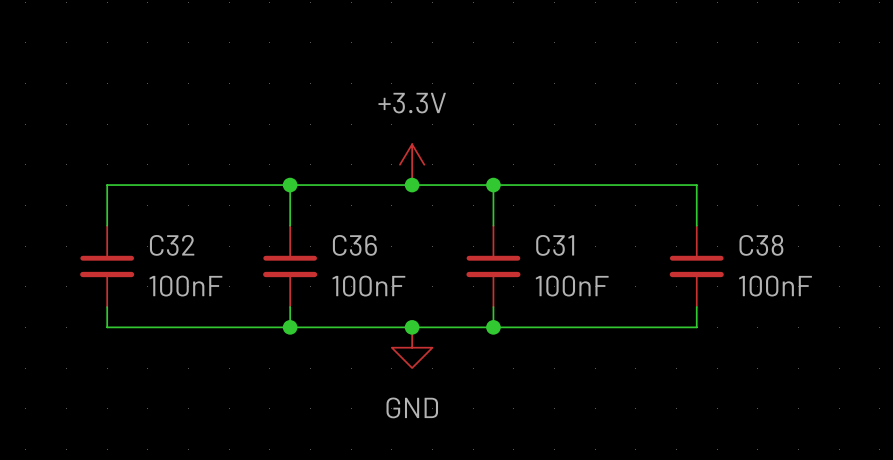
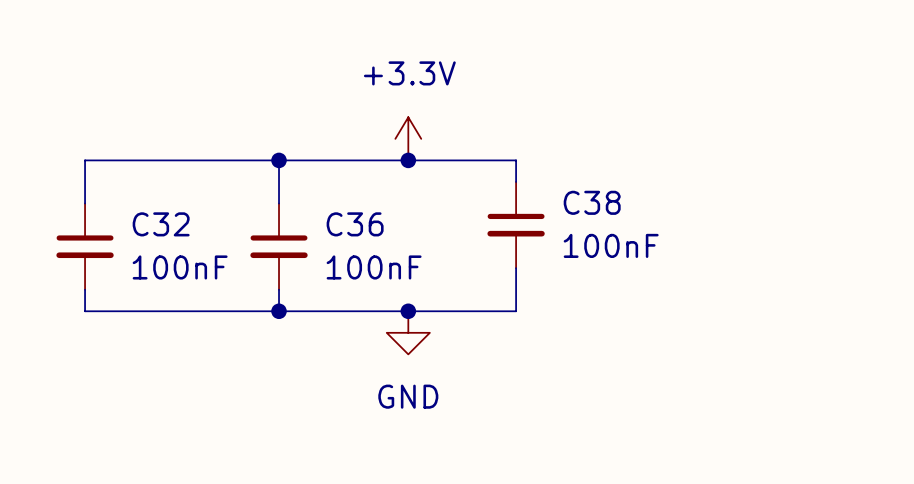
wire: (493, 185) (493, 225) -> none
junction: (493, 185) -> none
wire: (513, 185) (696, 185) (696, 225) -> (516, 160) (516, 181)
C31: 100nF (493, 266) -> none
C38 position: (696, 266) -> (516, 225)
wire: (493, 307) (493, 327) -> none
wire: (696, 307) (696, 327) (513, 327) -> (516, 268) (516, 311)
junction: (493, 327) -> none

